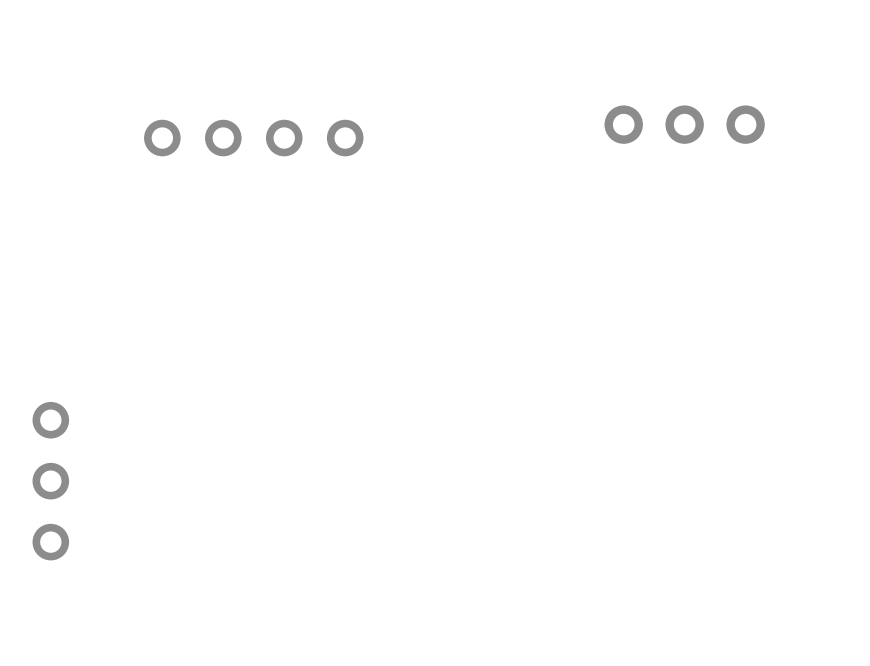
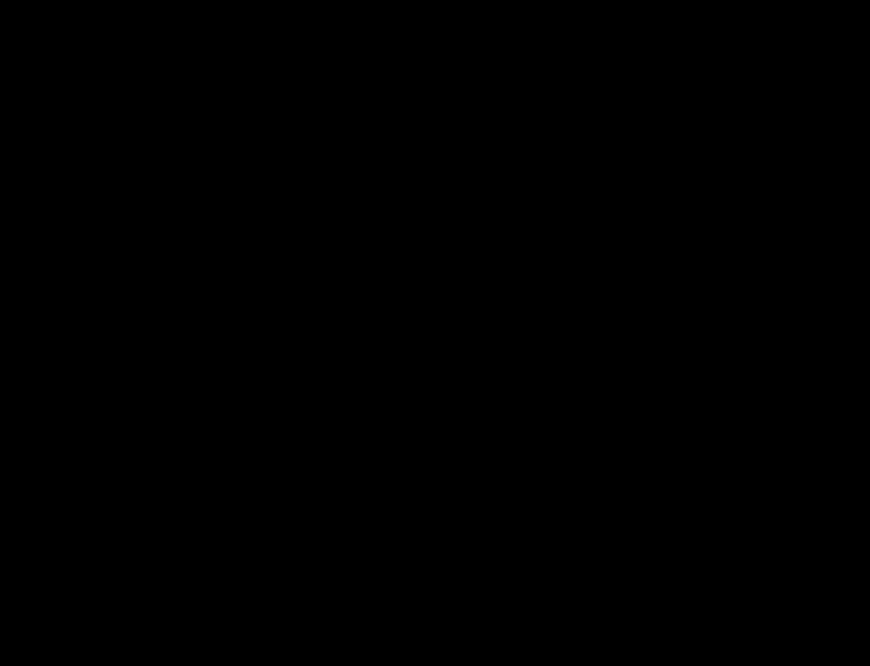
part: (684, 124) -> none
part: (253, 138) -> none
part: (50, 481) -> none

